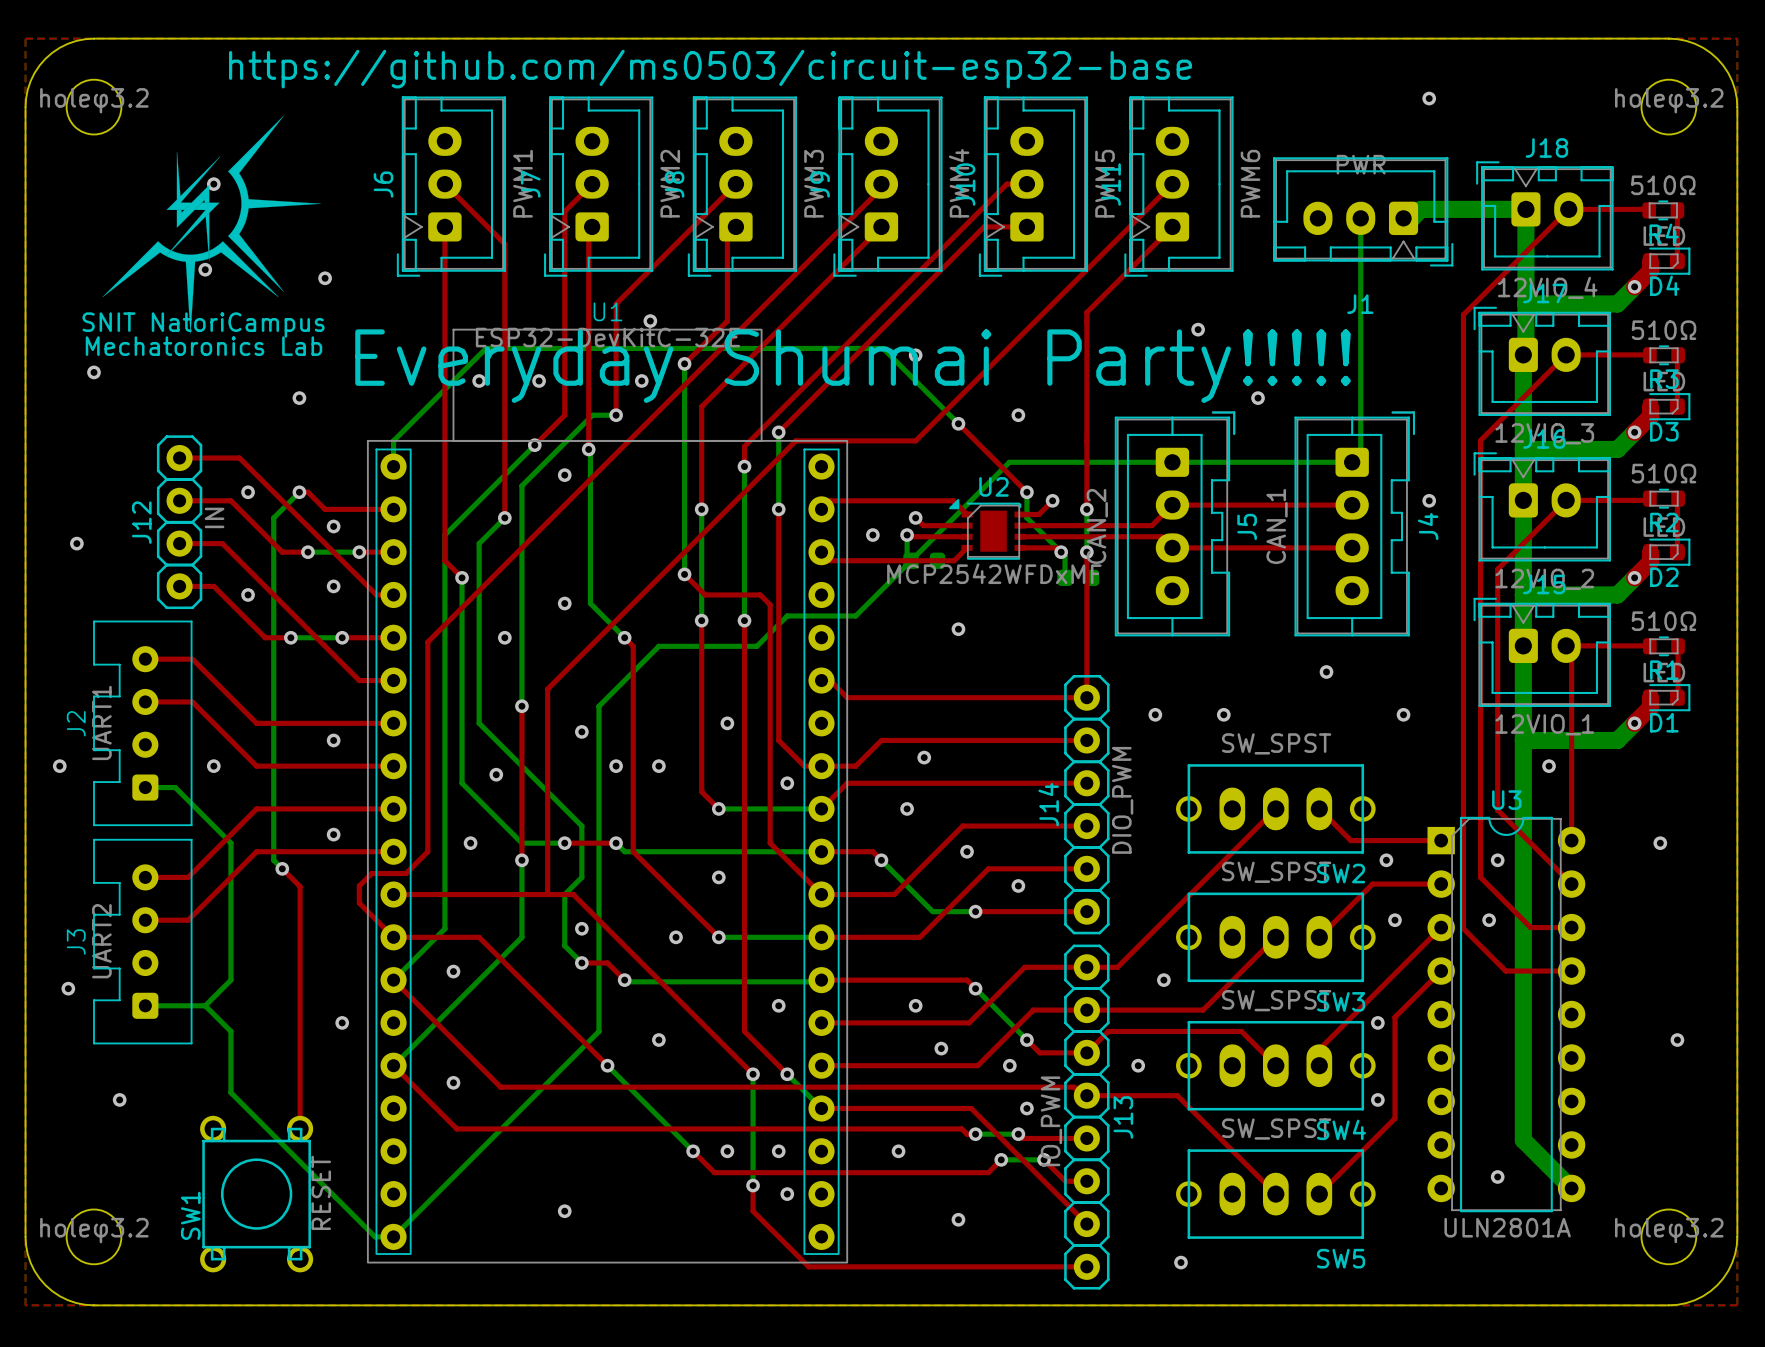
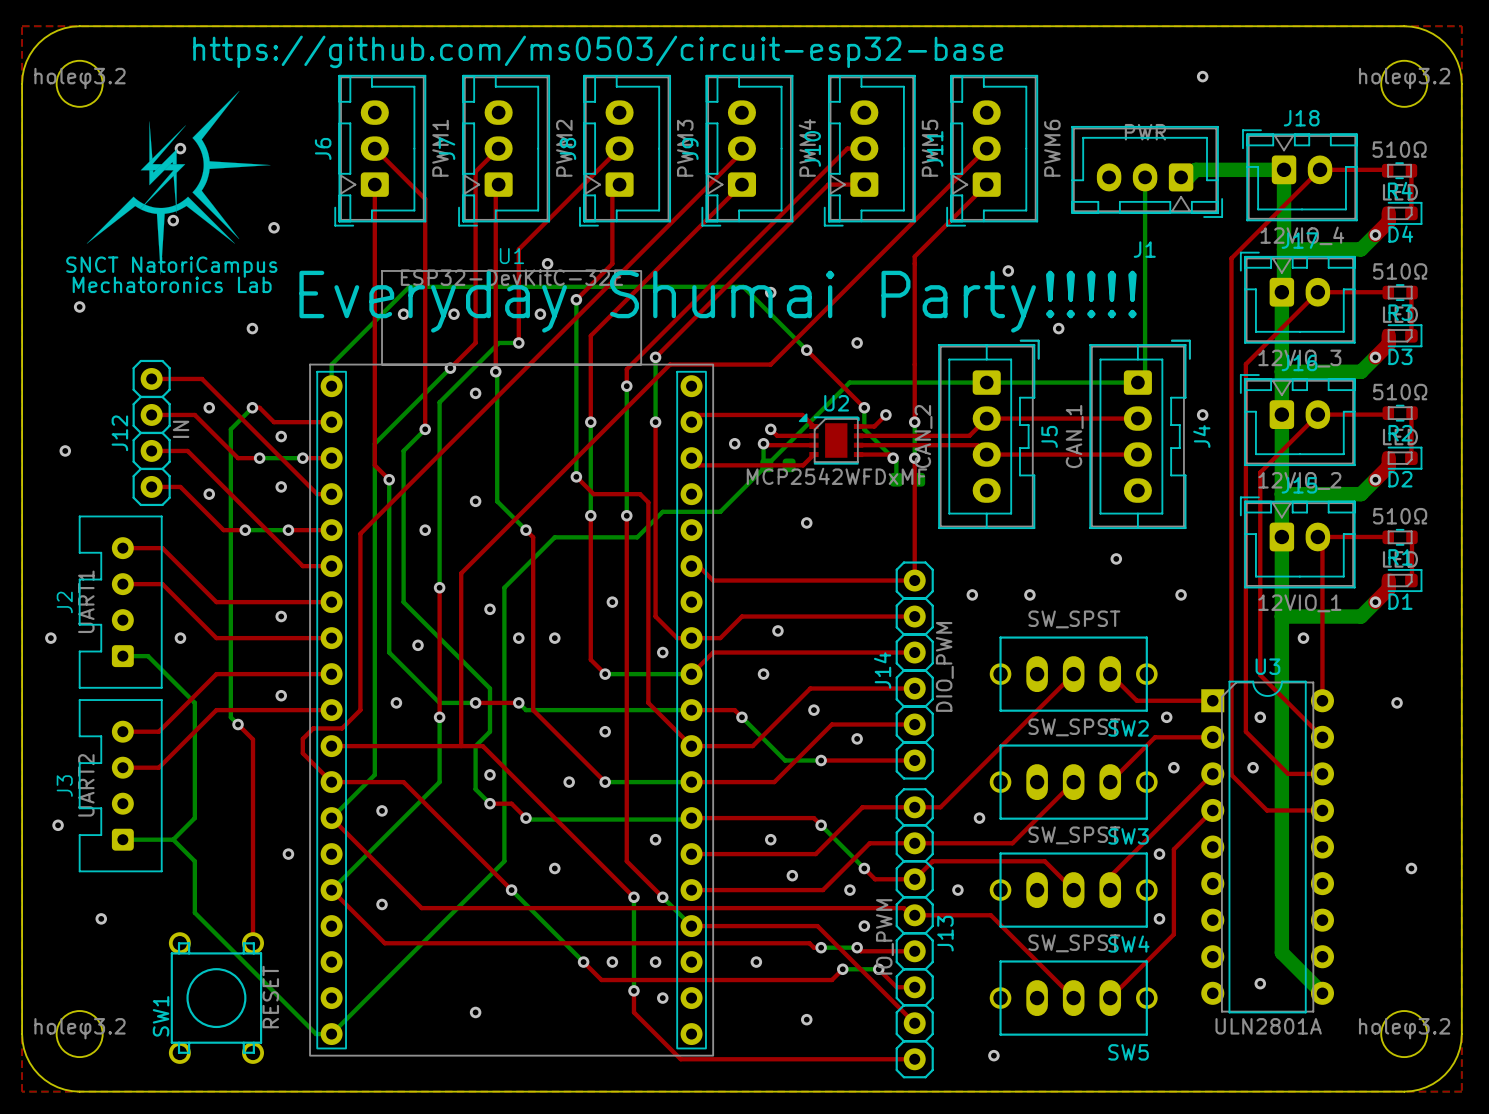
drawing shape: [82, 115, 325, 356] -> [66, 91, 278, 294]

